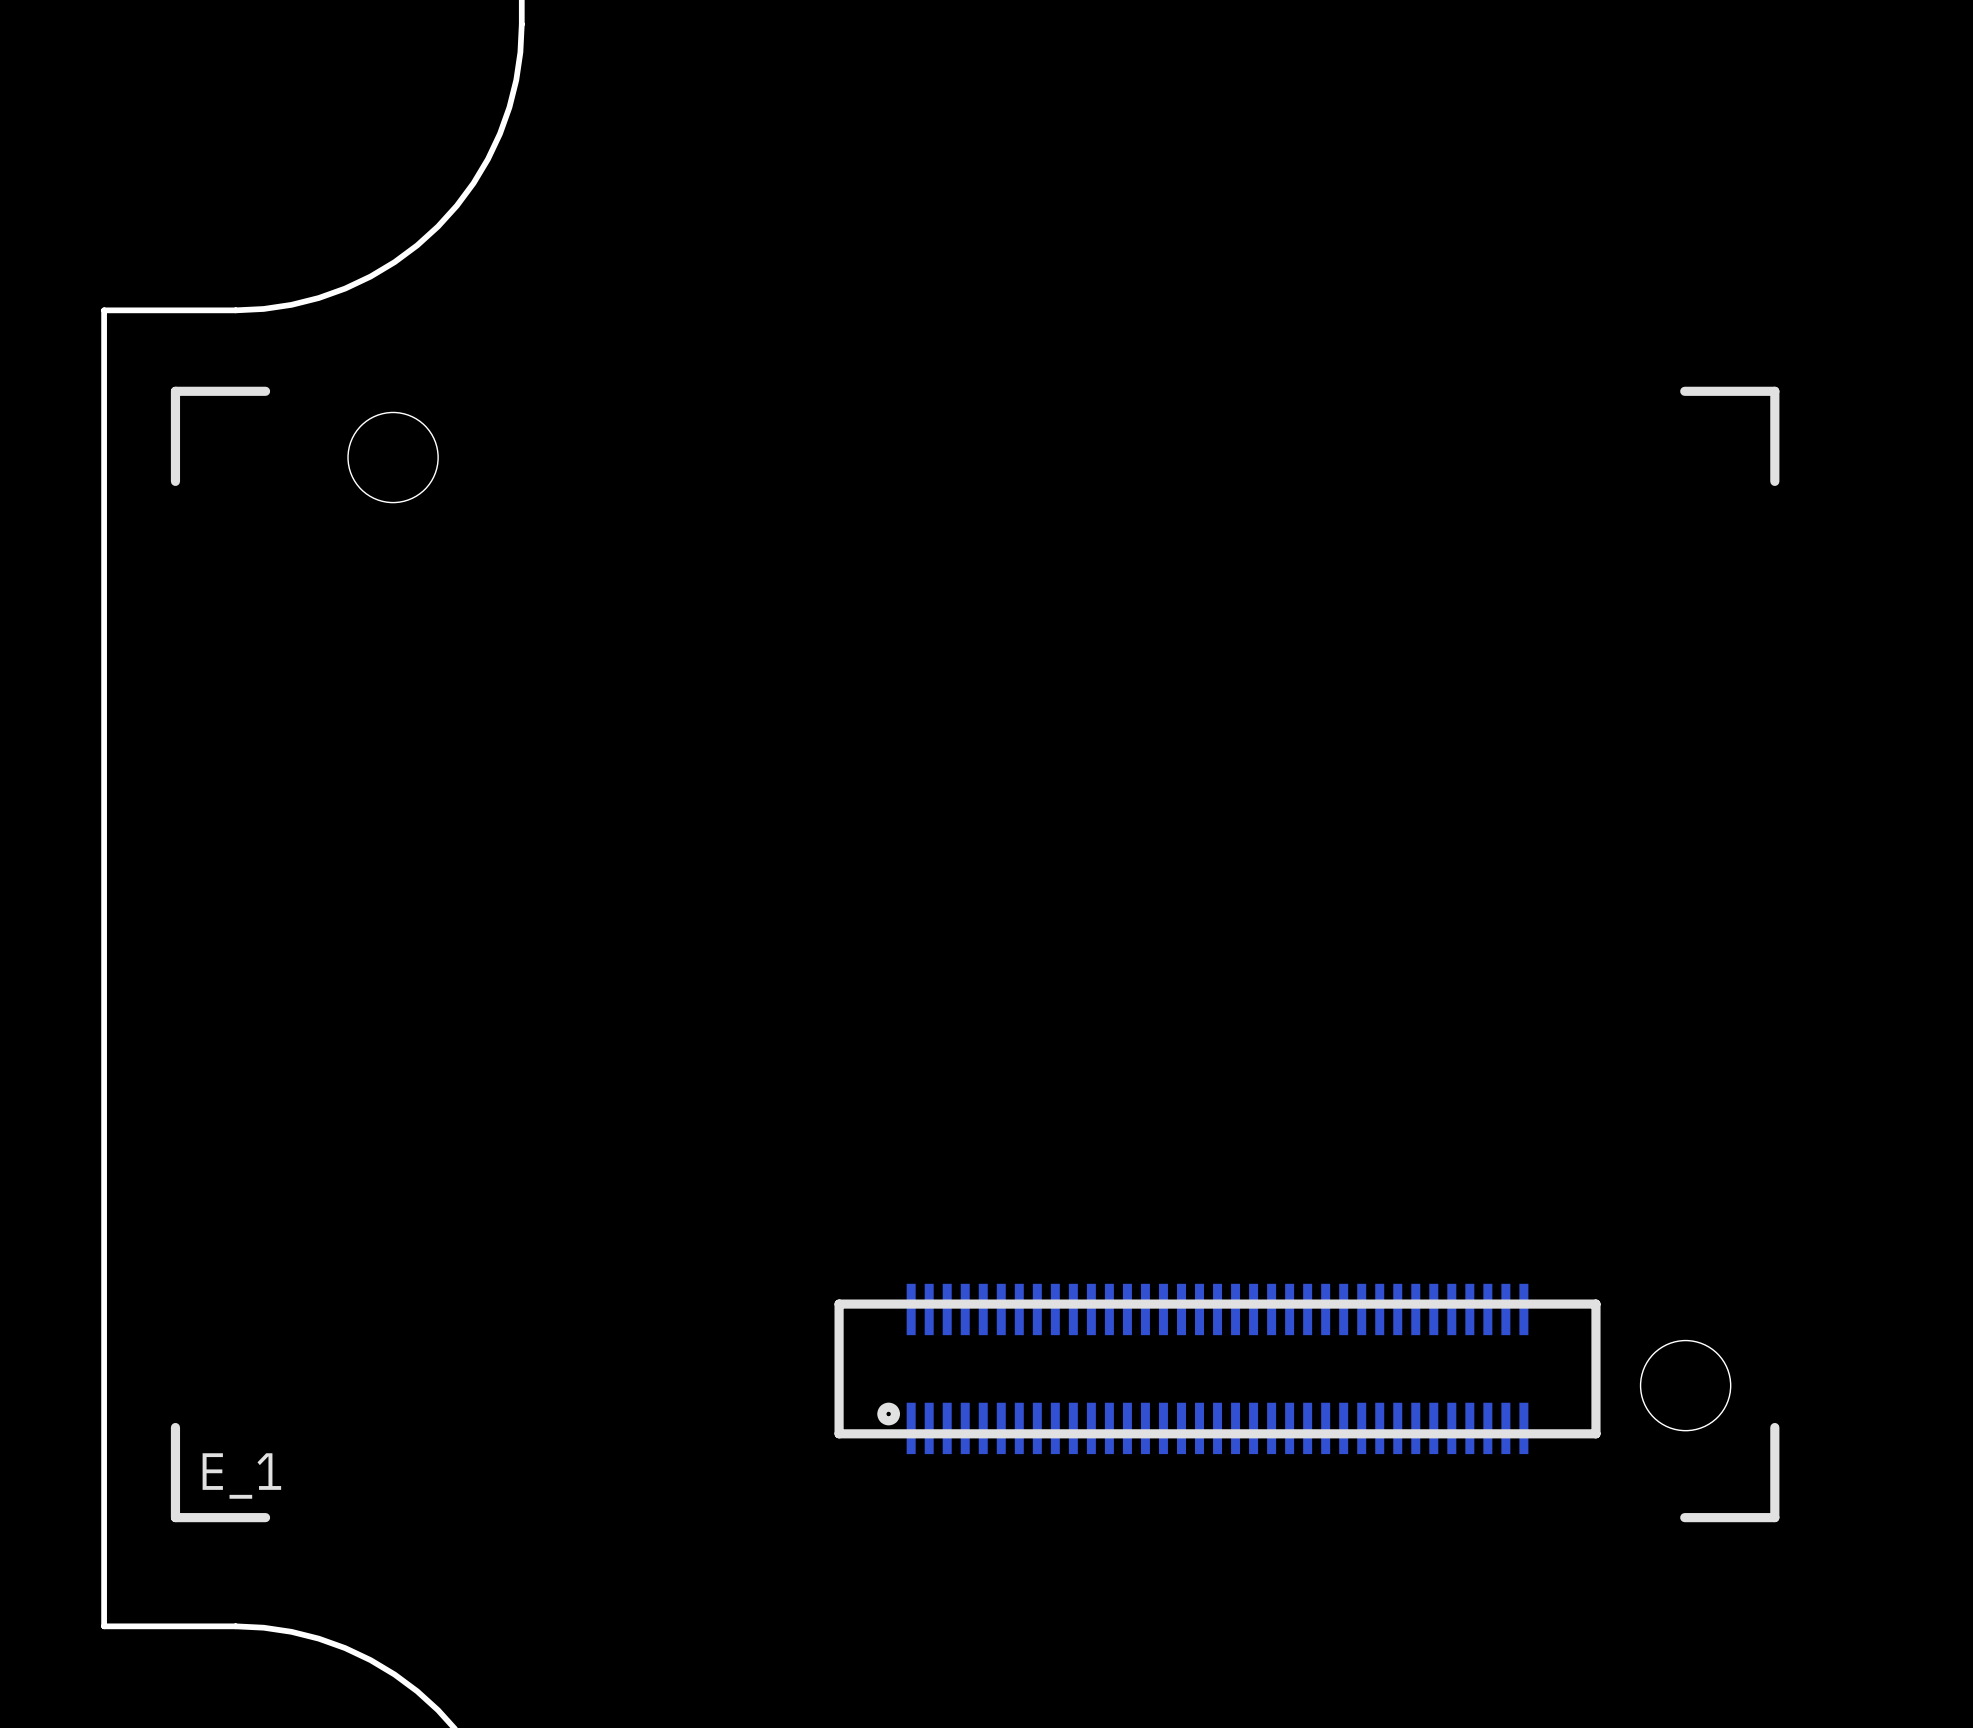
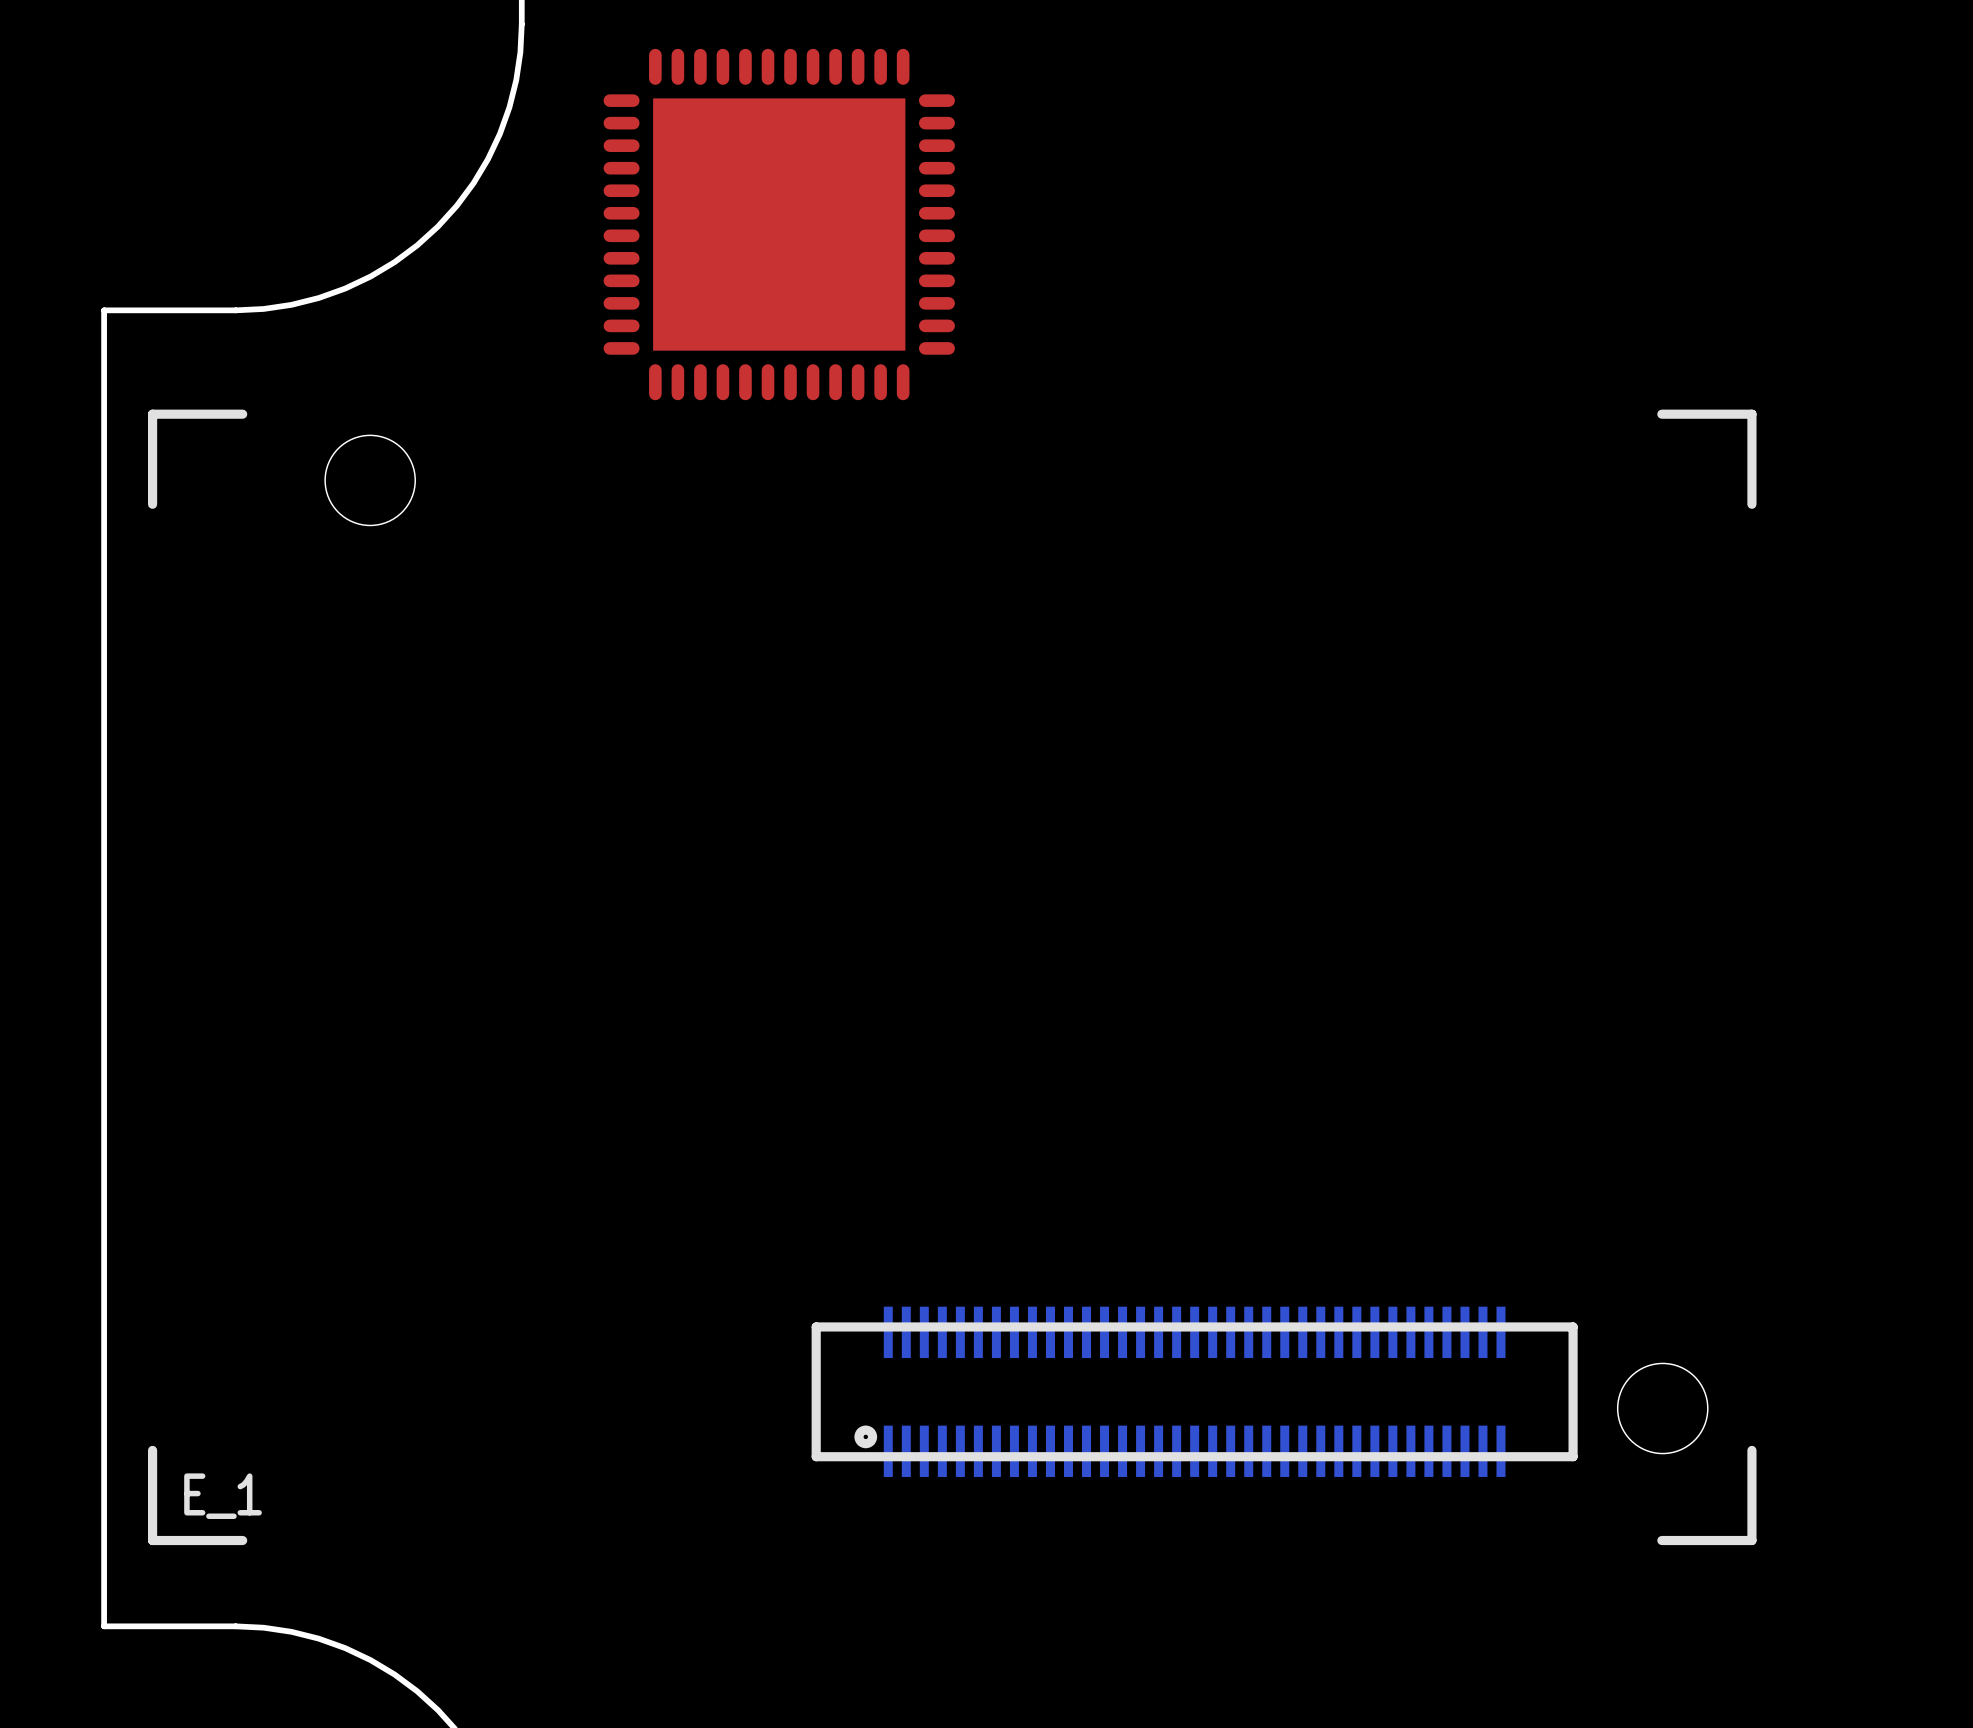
part: none -> (779, 224)
E_1 position: (975, 954) -> (952, 977)

